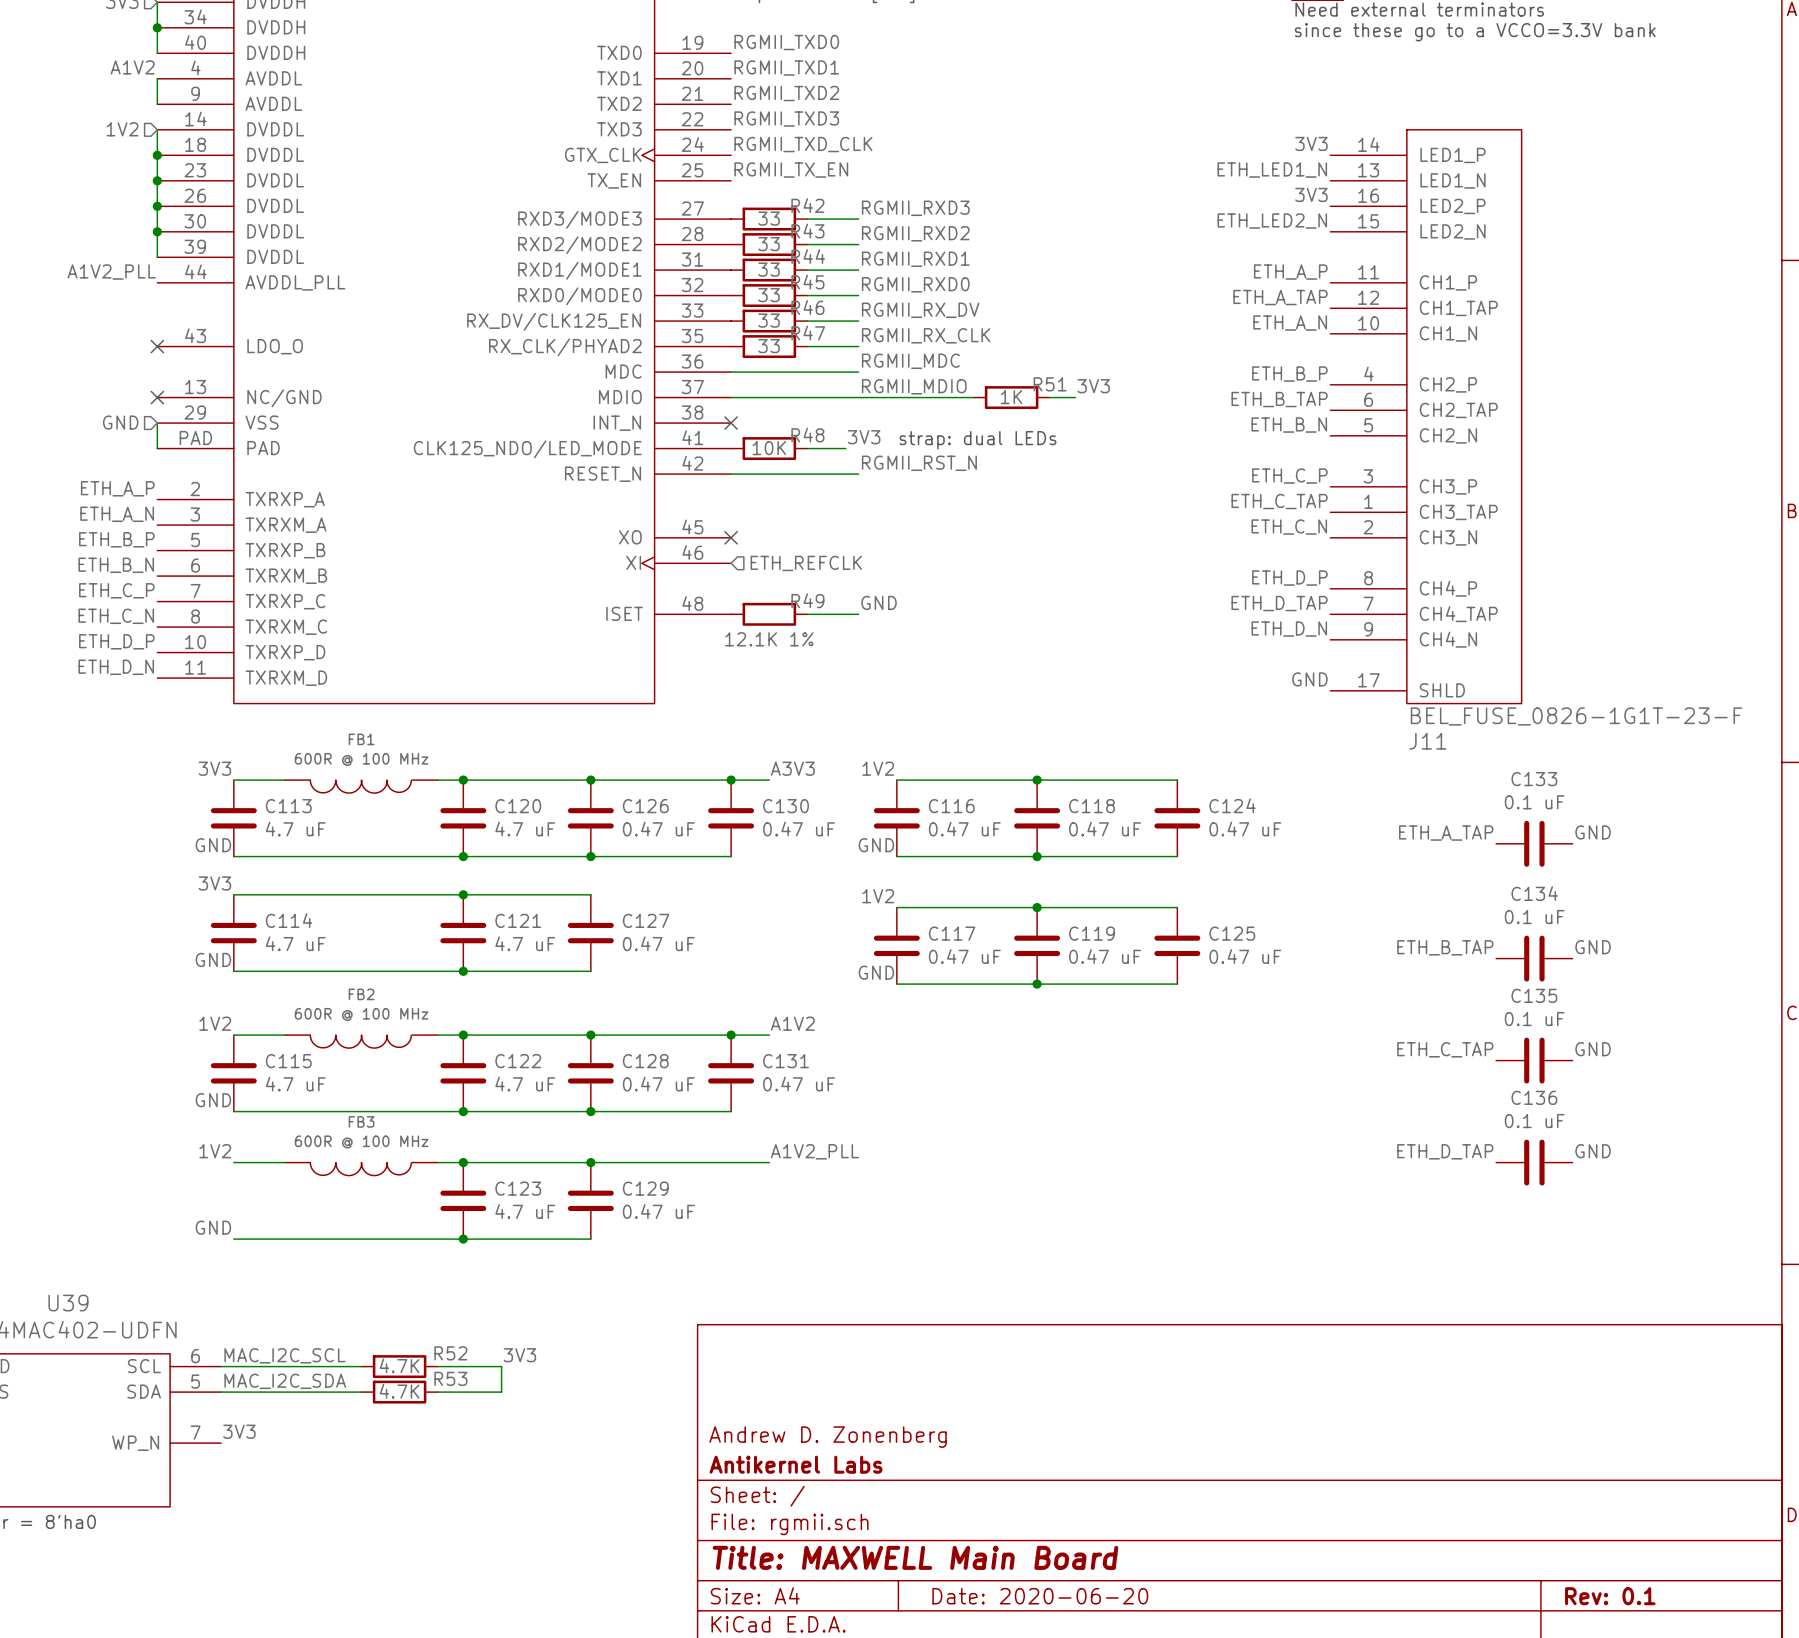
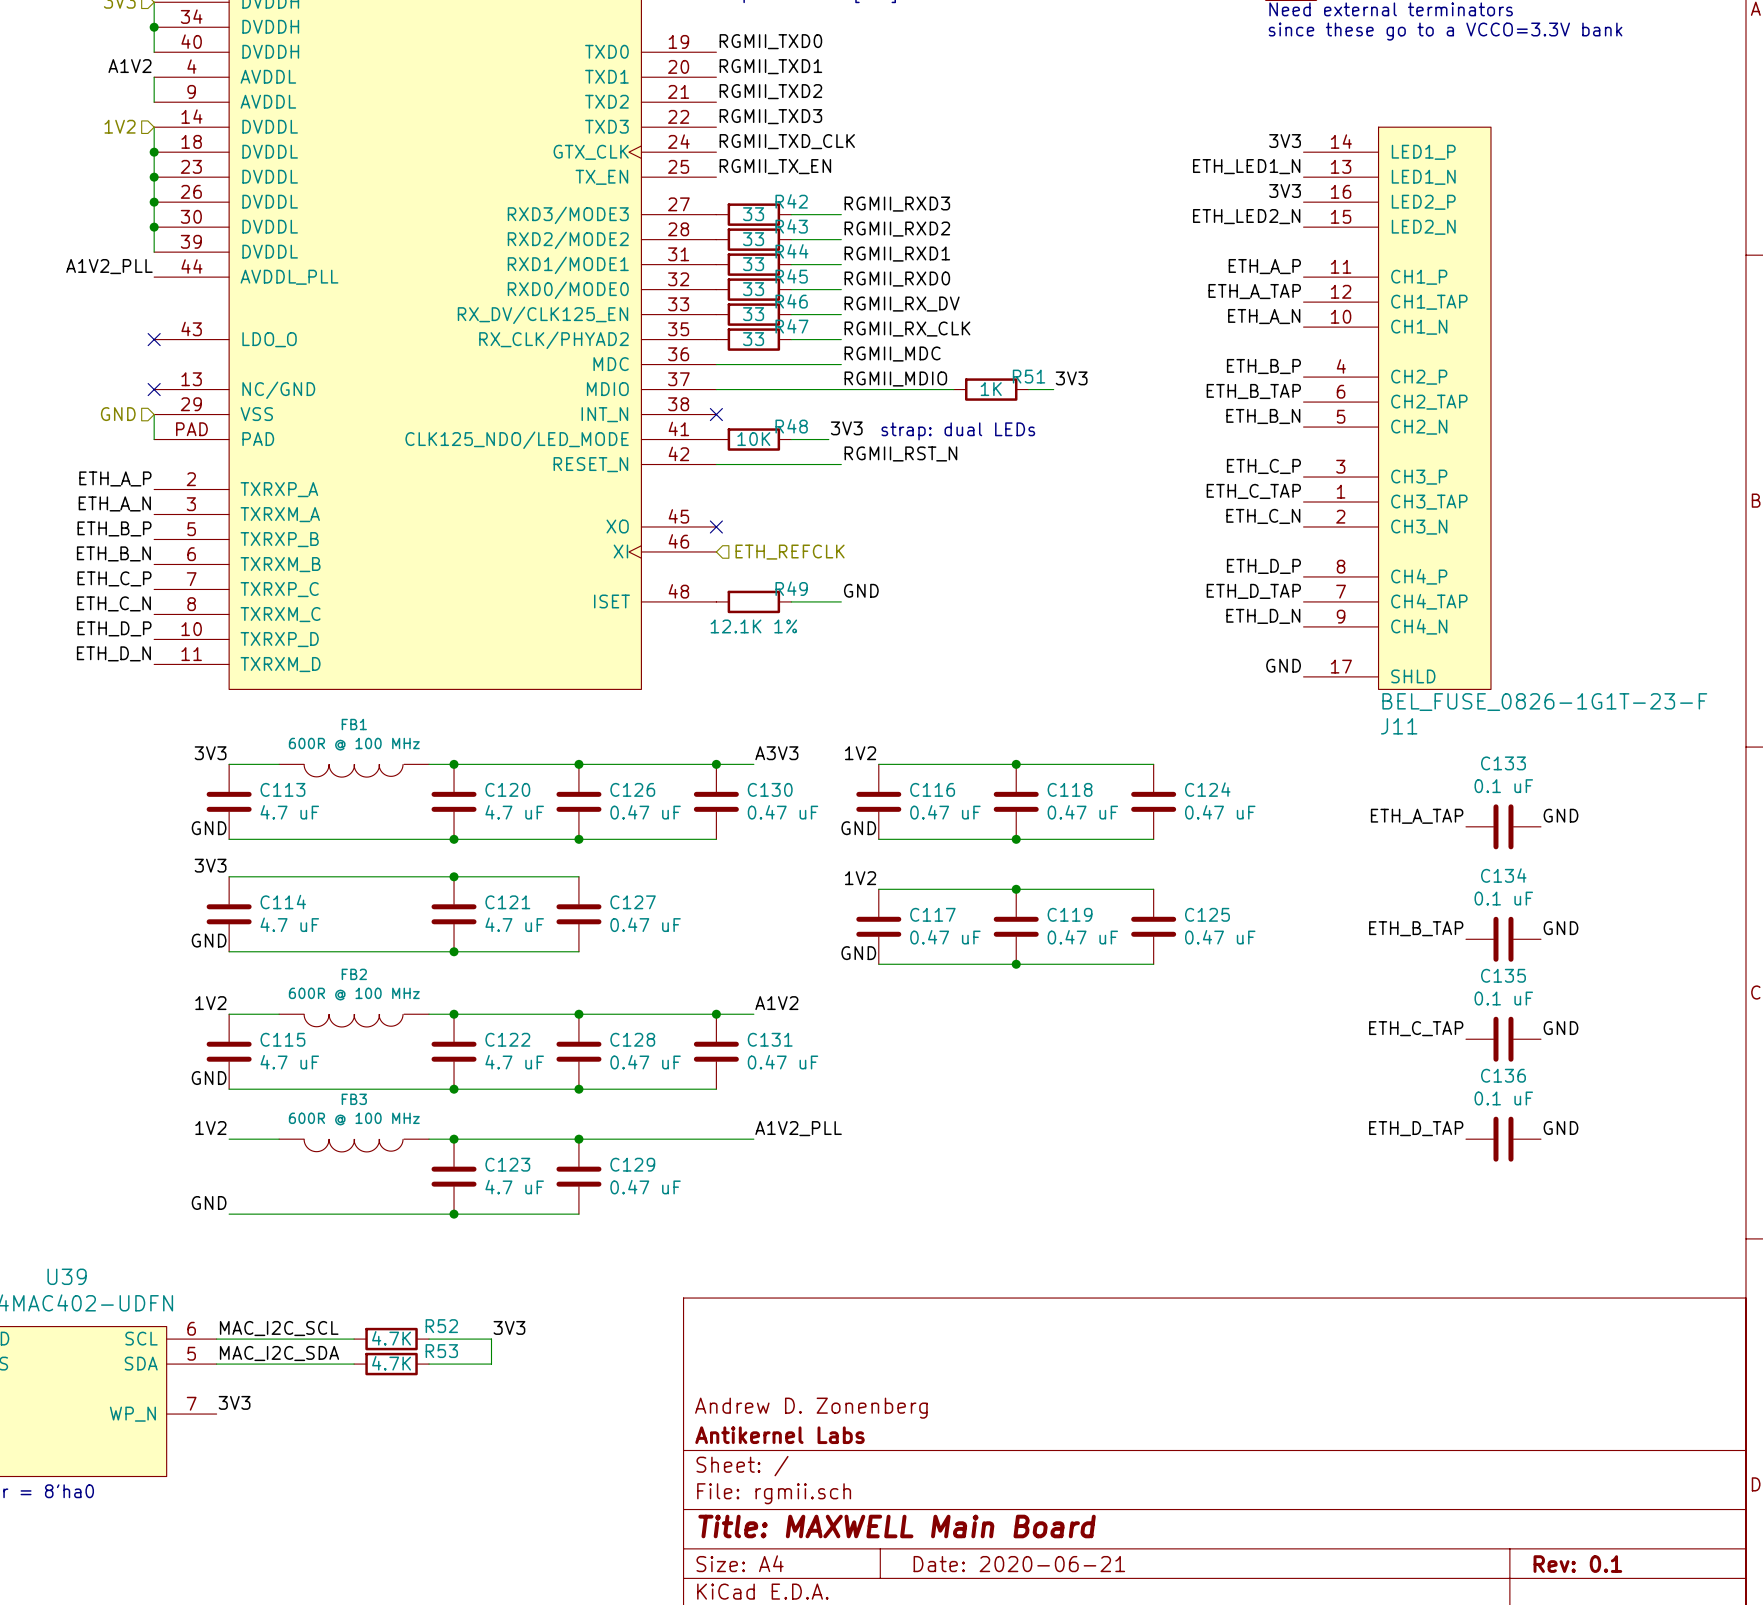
title block: Date: 2020-06-20 (1040, 1596) -> Date: 2020-06-21 (1019, 1564)

